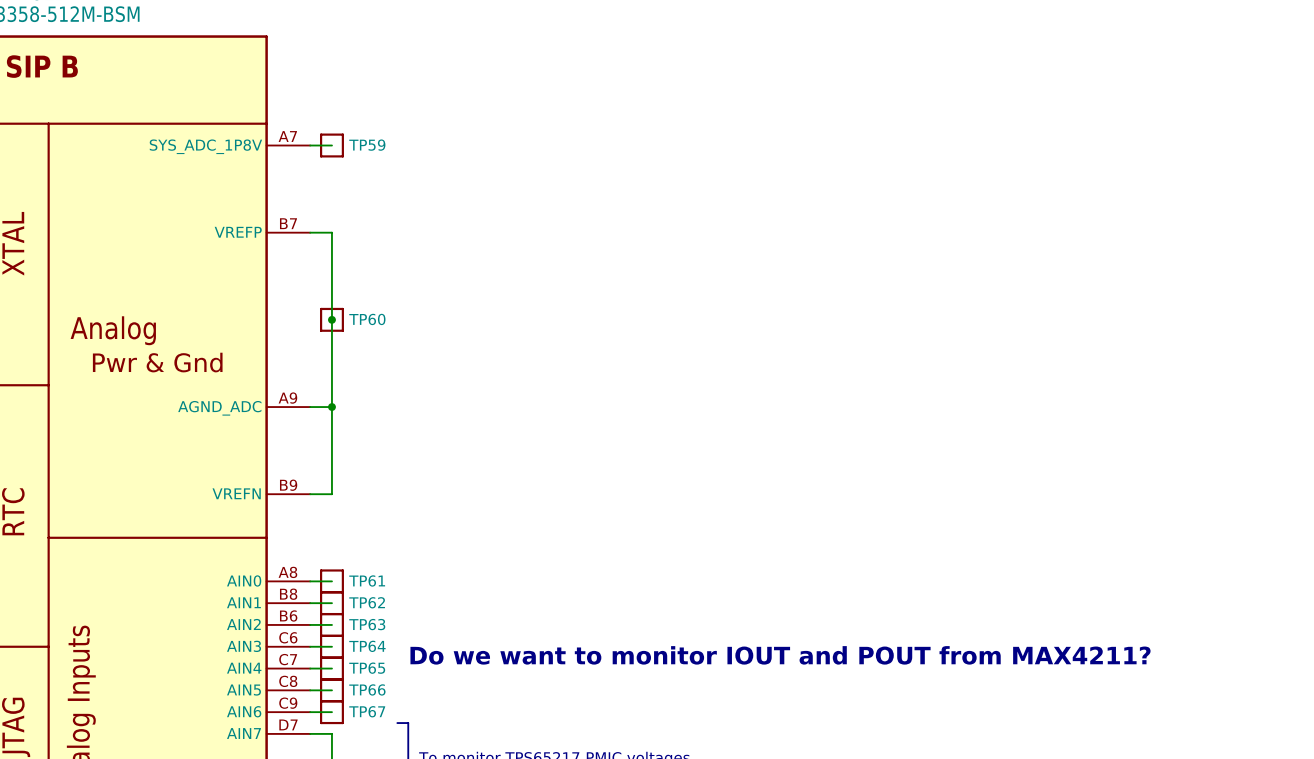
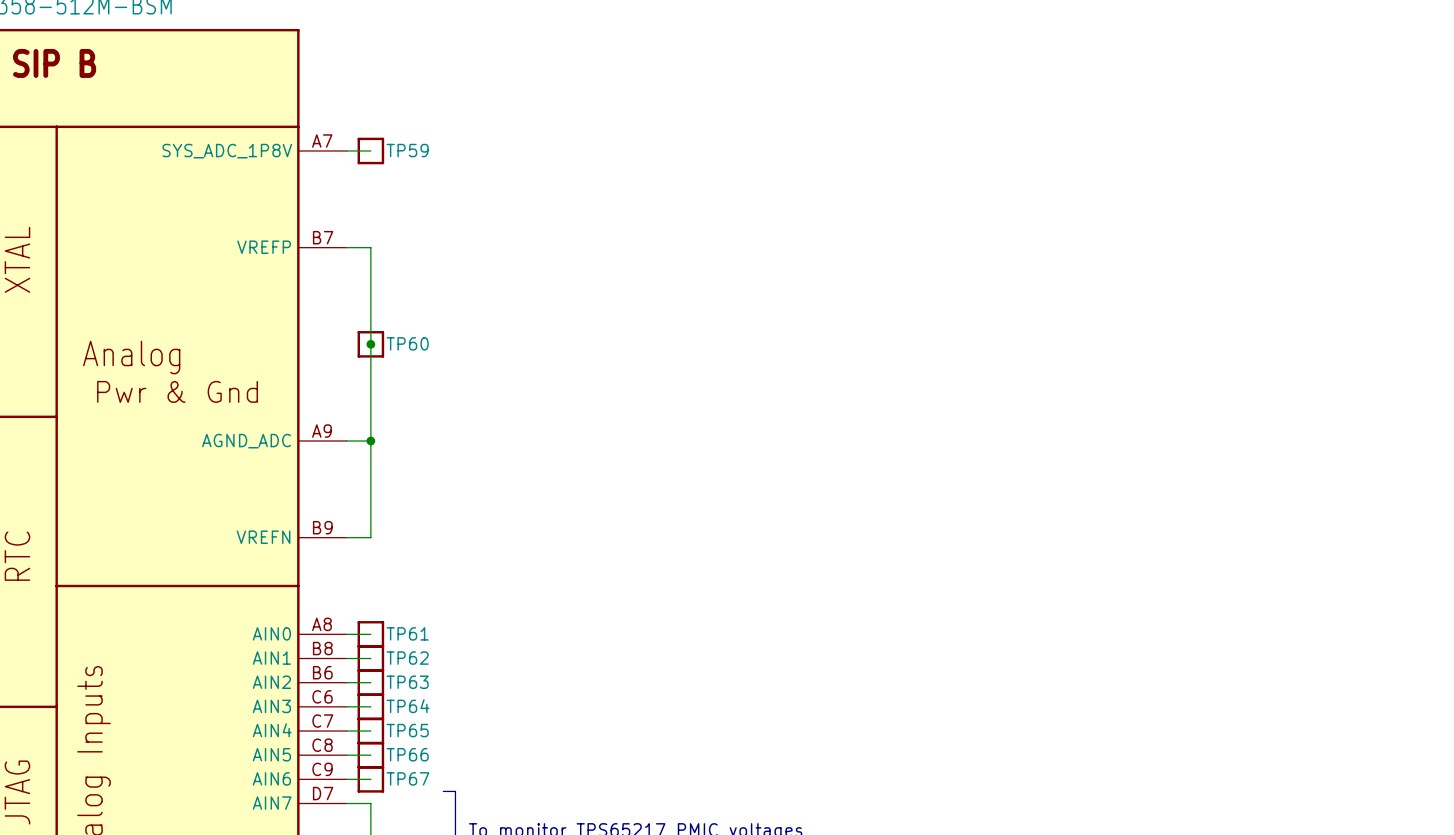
text: Do we want to monitor IOUT and POUT from MAX4211? (780, 655) -> none

